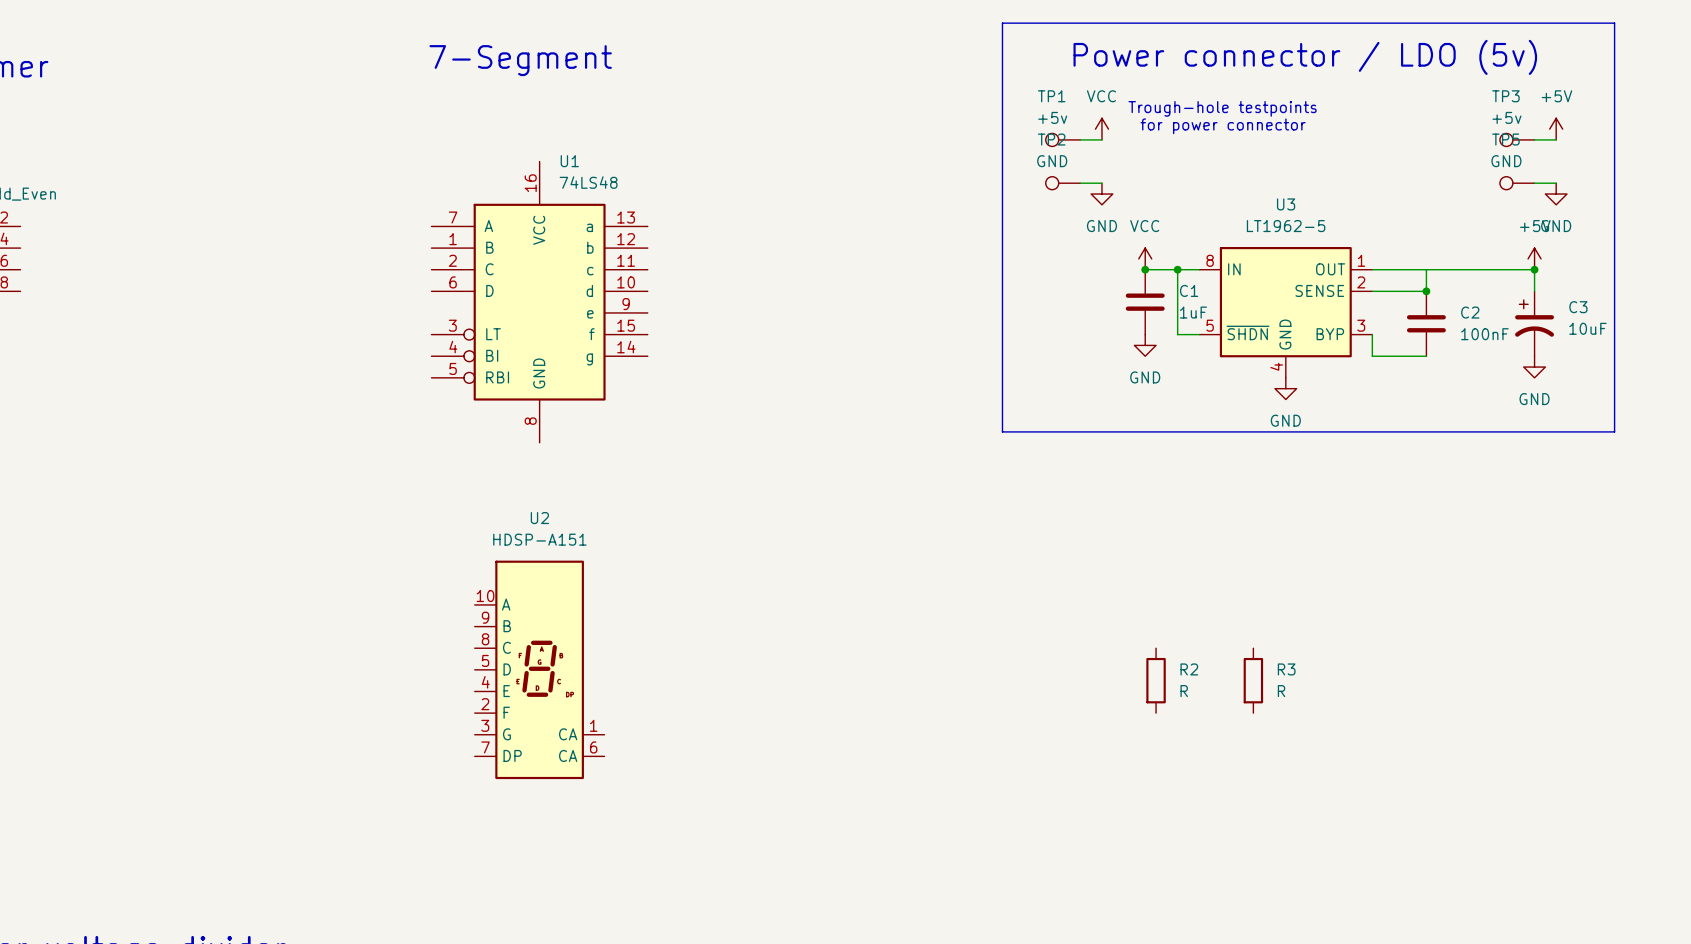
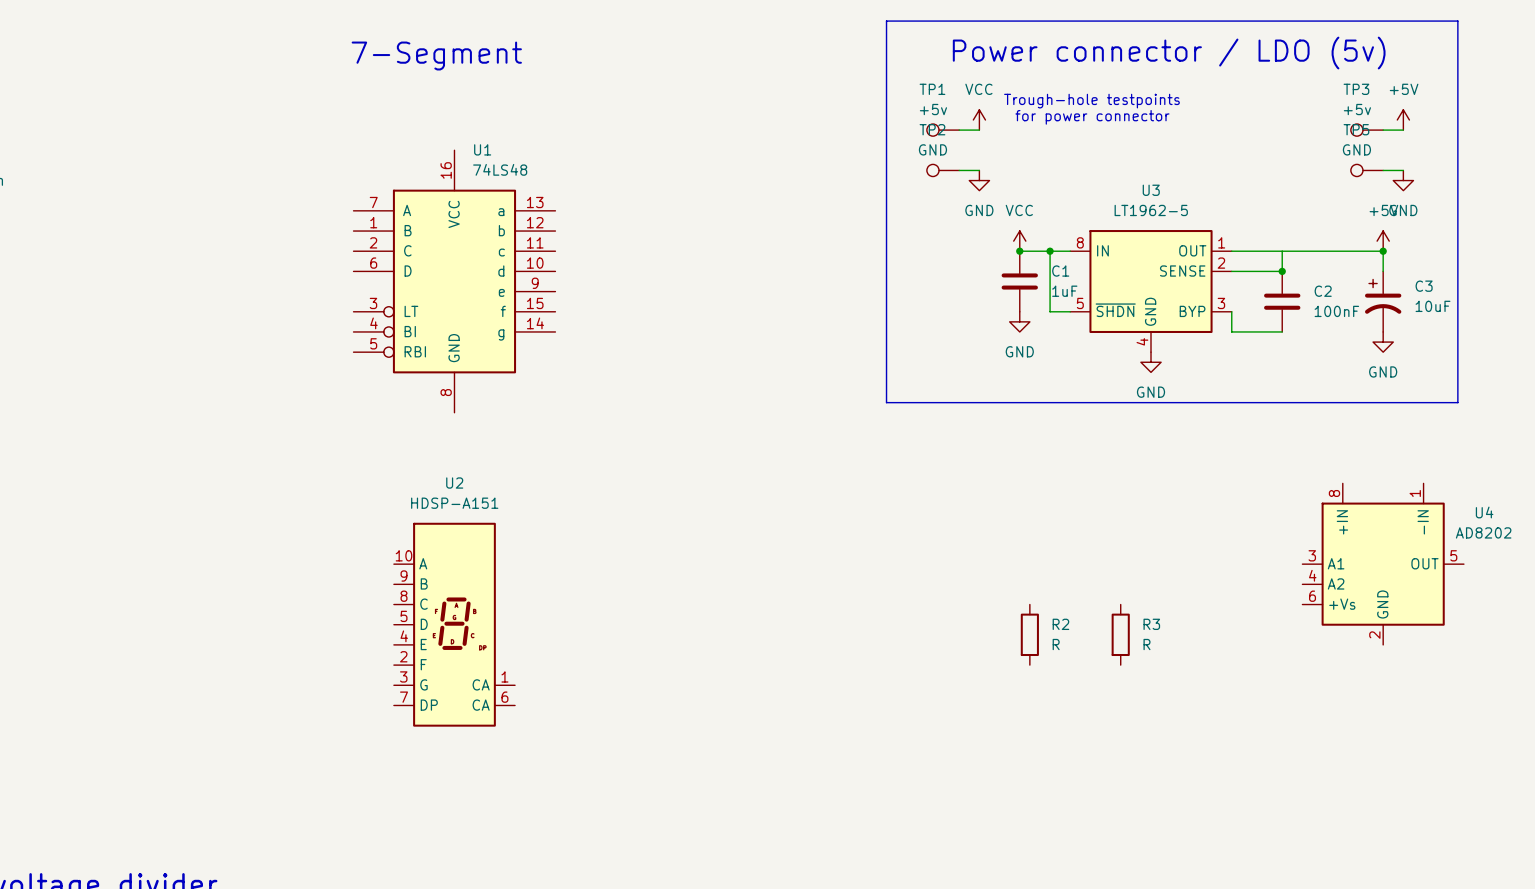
U4: none -> AD8202 (1383, 564)

